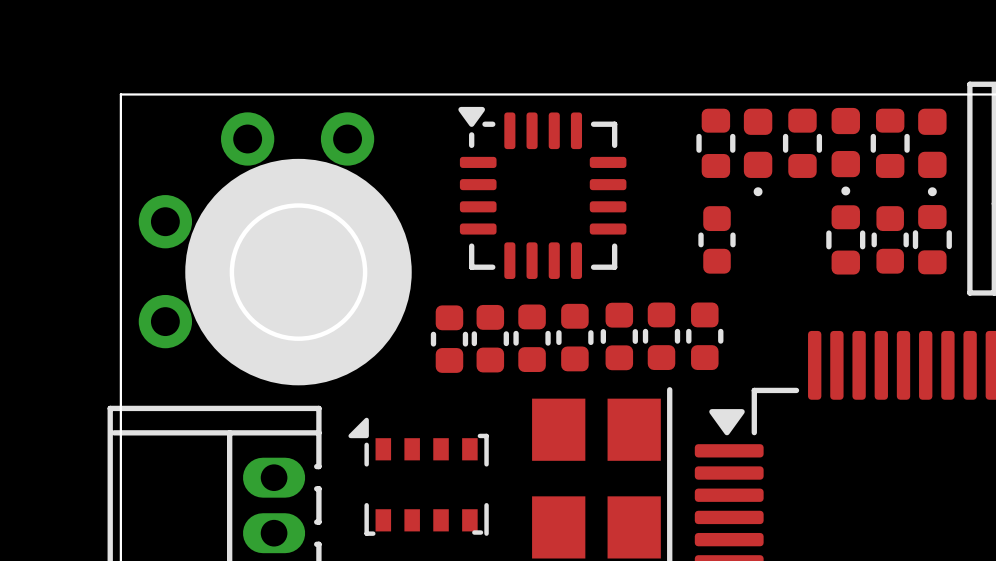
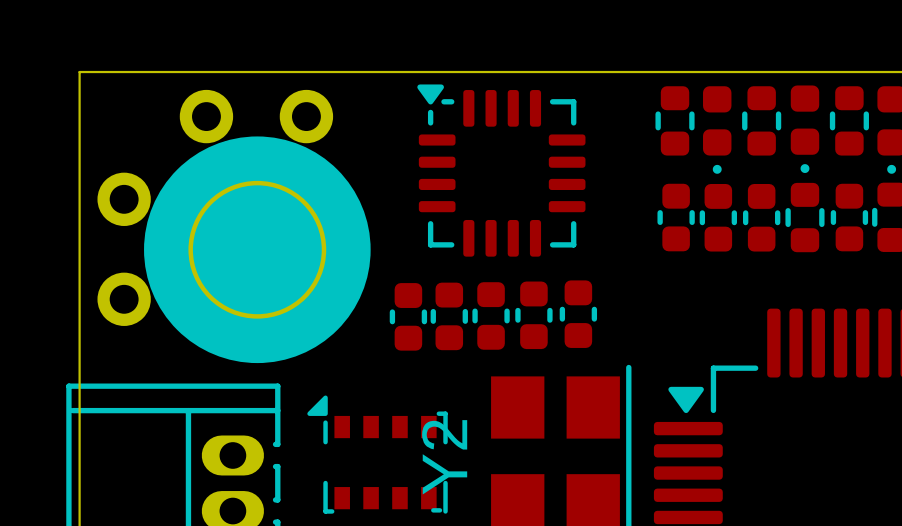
part: none -> (718, 217)
part: none -> (761, 217)
part: (661, 336) -> none
part: (704, 336) -> none
Y2 name: none -> Y2 (444, 457)

